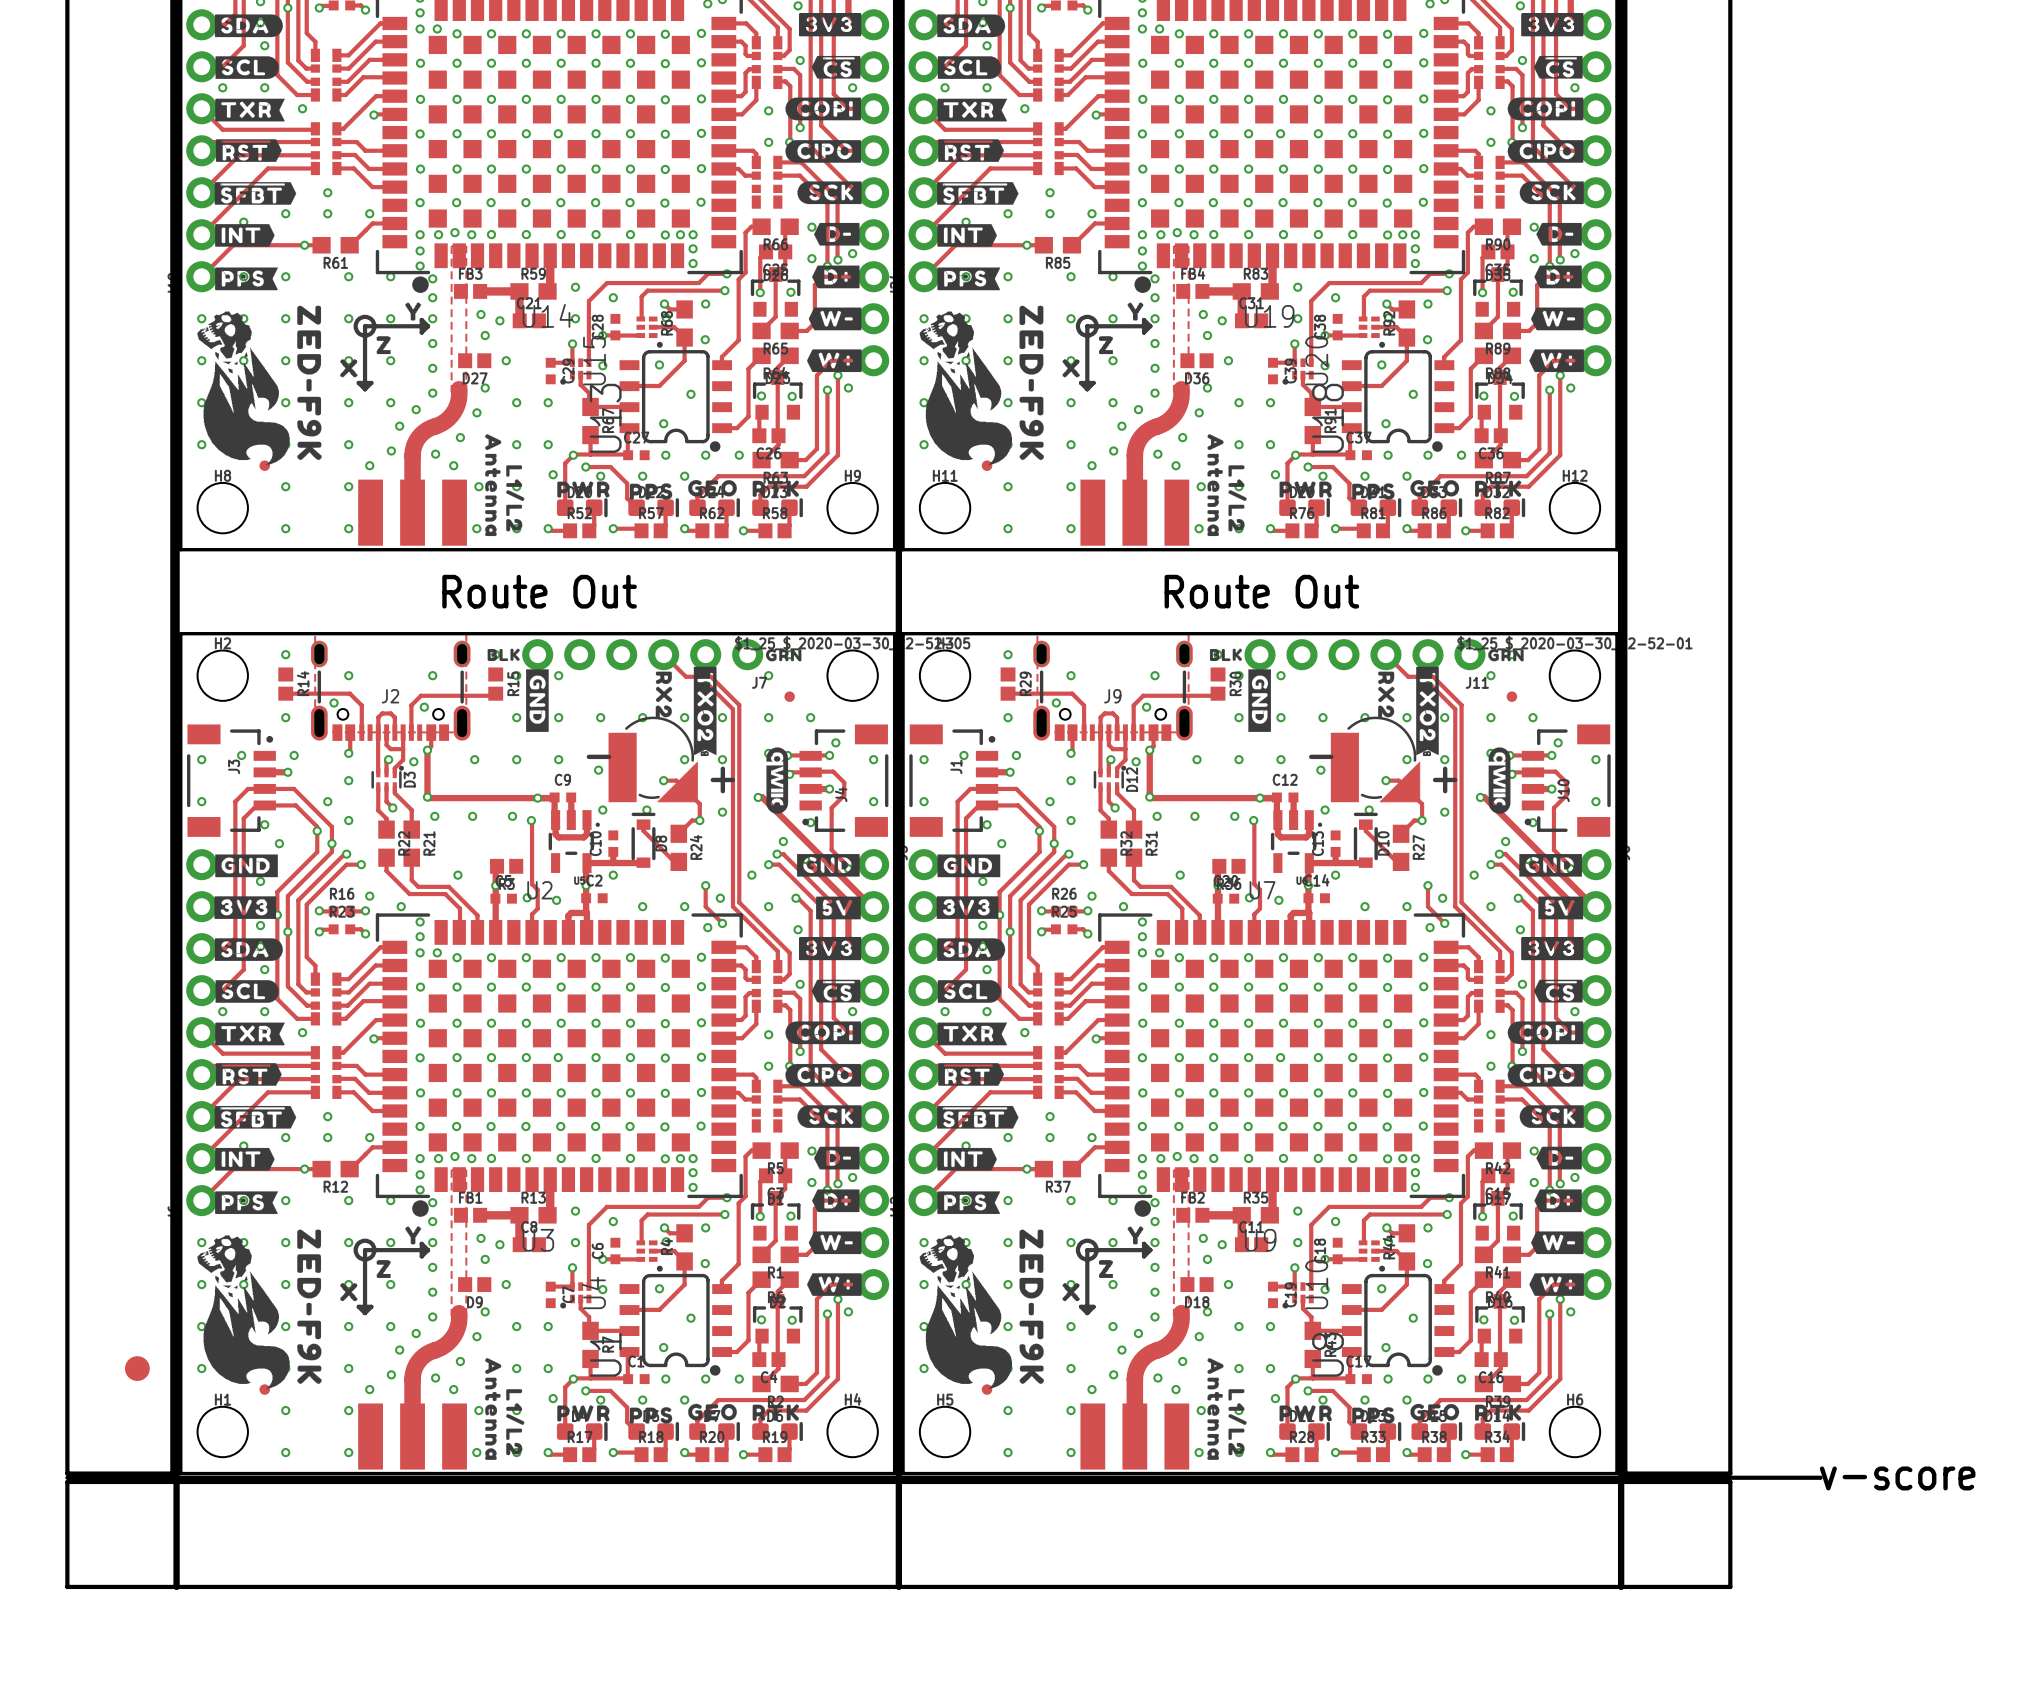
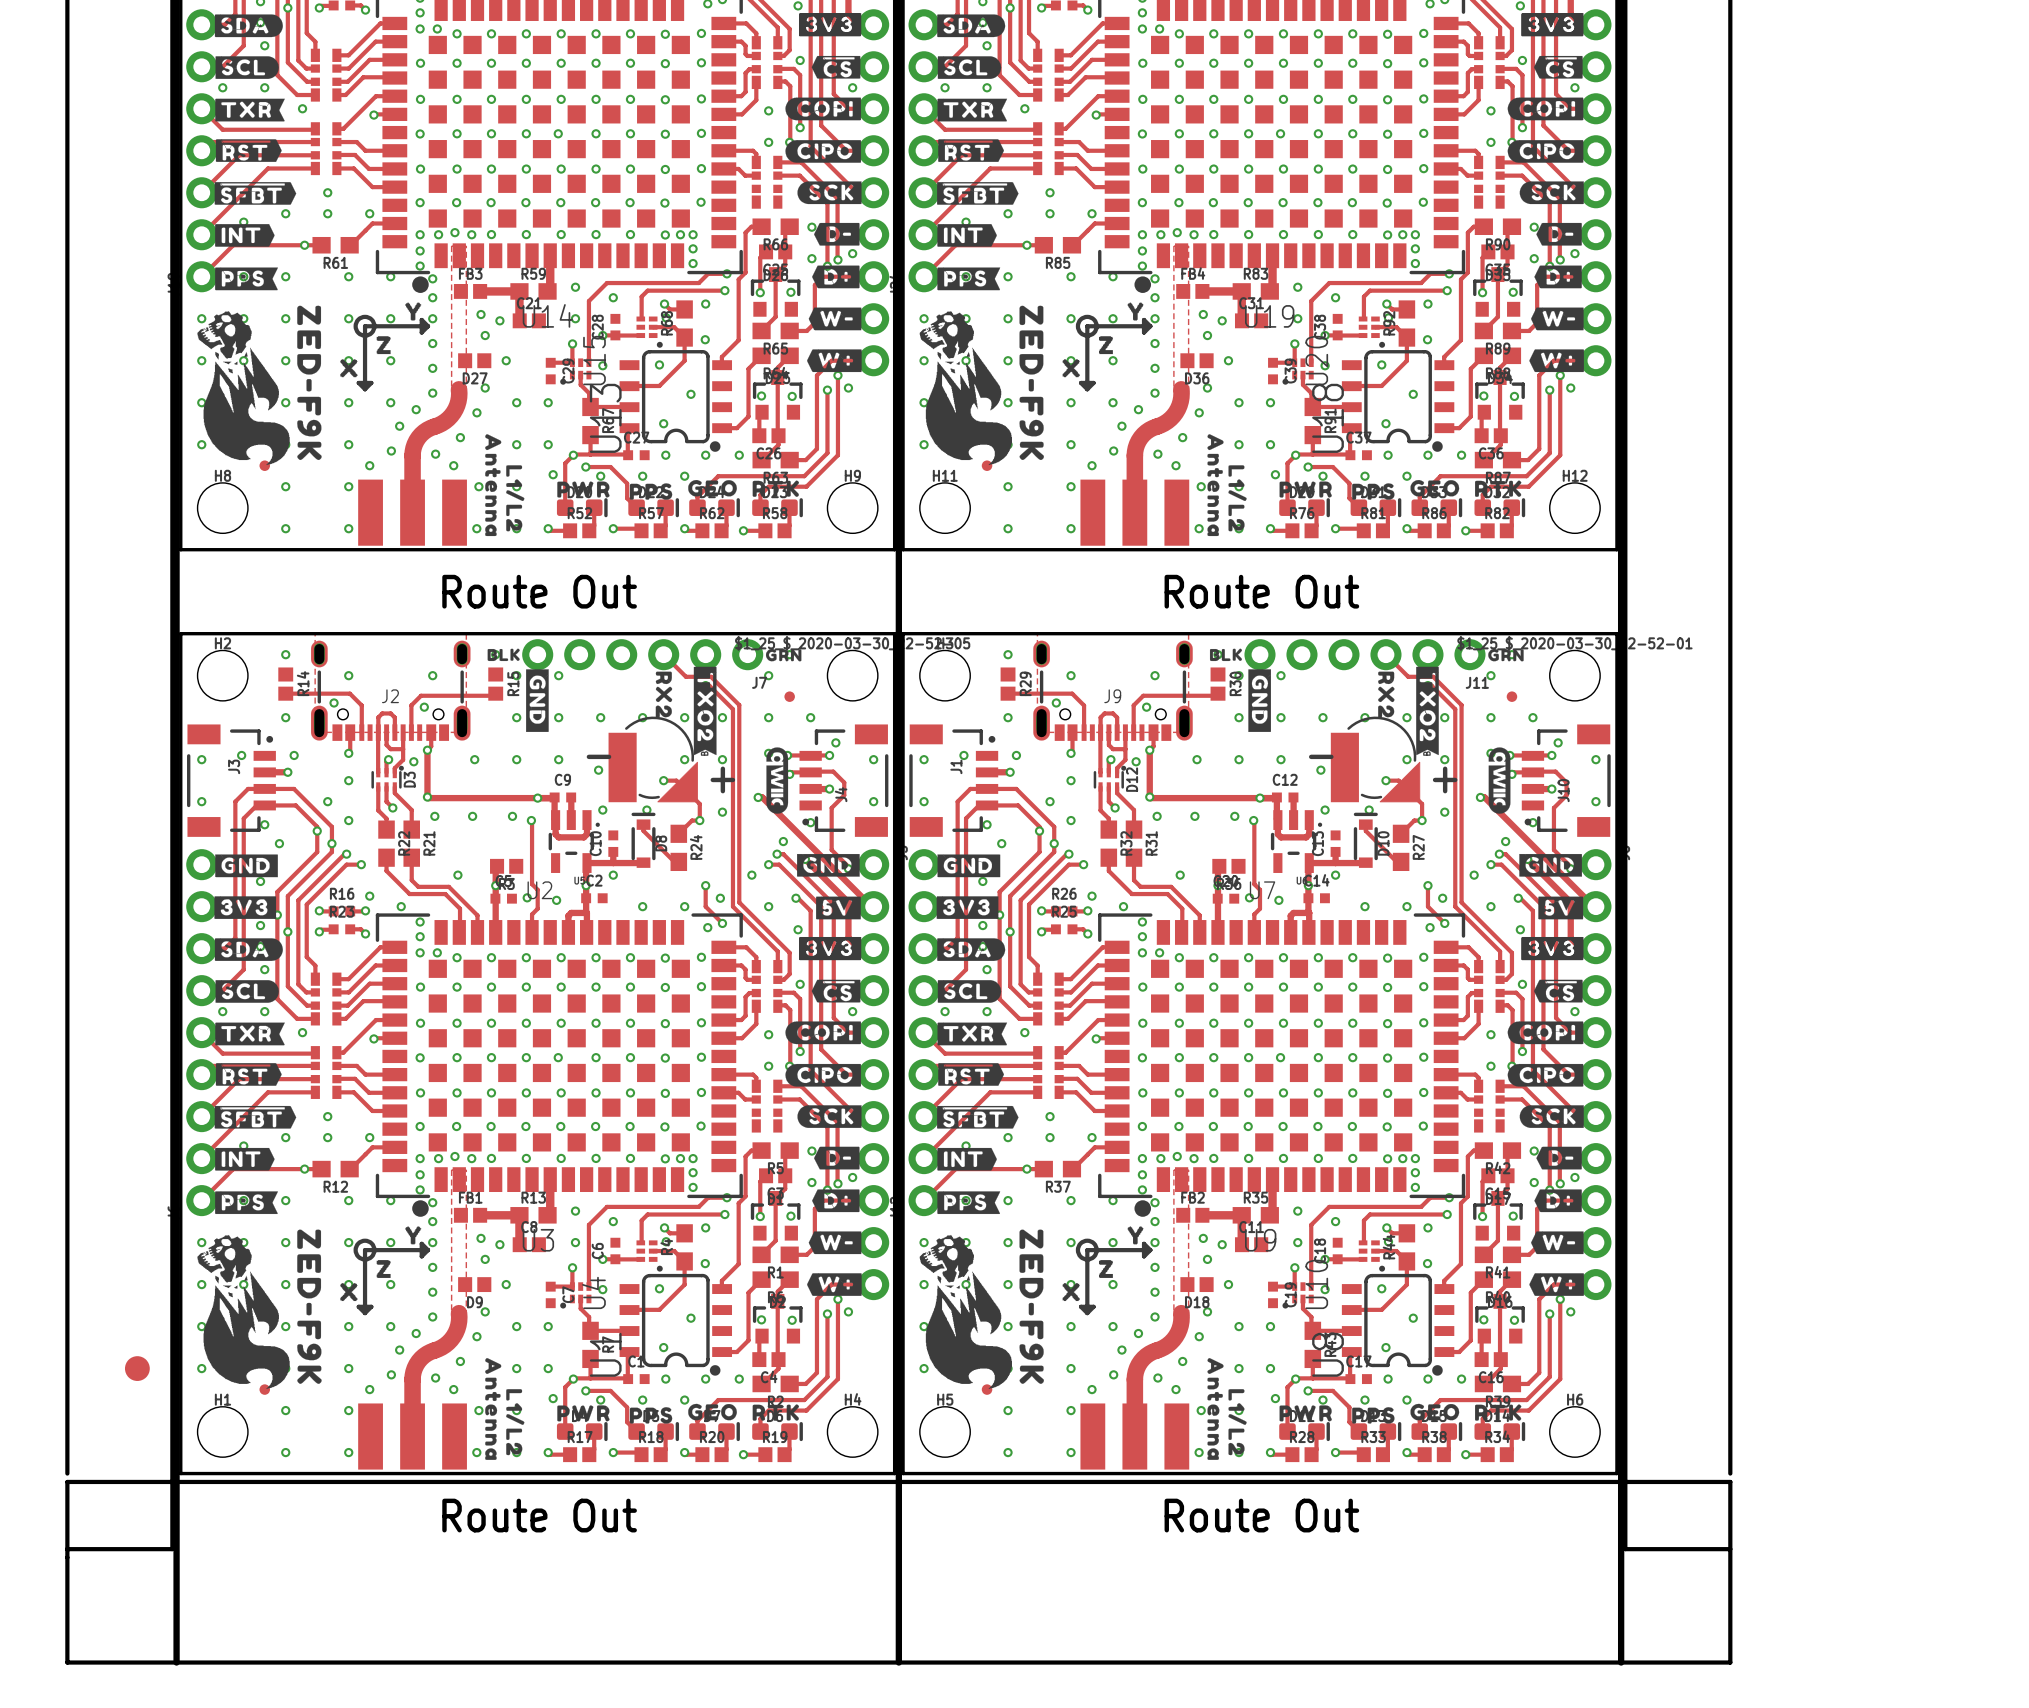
board edge: (67, 1473) (172, 1473) -> (67, 1549) (172, 1549) (172, 1473)
board edge: (1625, 1473) (1730, 1473) -> (1625, 1473) (1625, 1549) (1730, 1549)
board edge: (67, 1477) (1820, 1477) -> none
text: v-score (1897, 1478) -> none
text: none -> Route Out (539, 1515)
text: none -> Route Out (1261, 1515)
board edge: (67, 1586) (1730, 1586) -> (67, 1586) (67, 1662) (1730, 1662) (1730, 1586)
board edge: none -> (176, 1586) (176, 1662)
board edge: none -> (898, 1586) (898, 1662)
board edge: none -> (1621, 1586) (1621, 1662)

